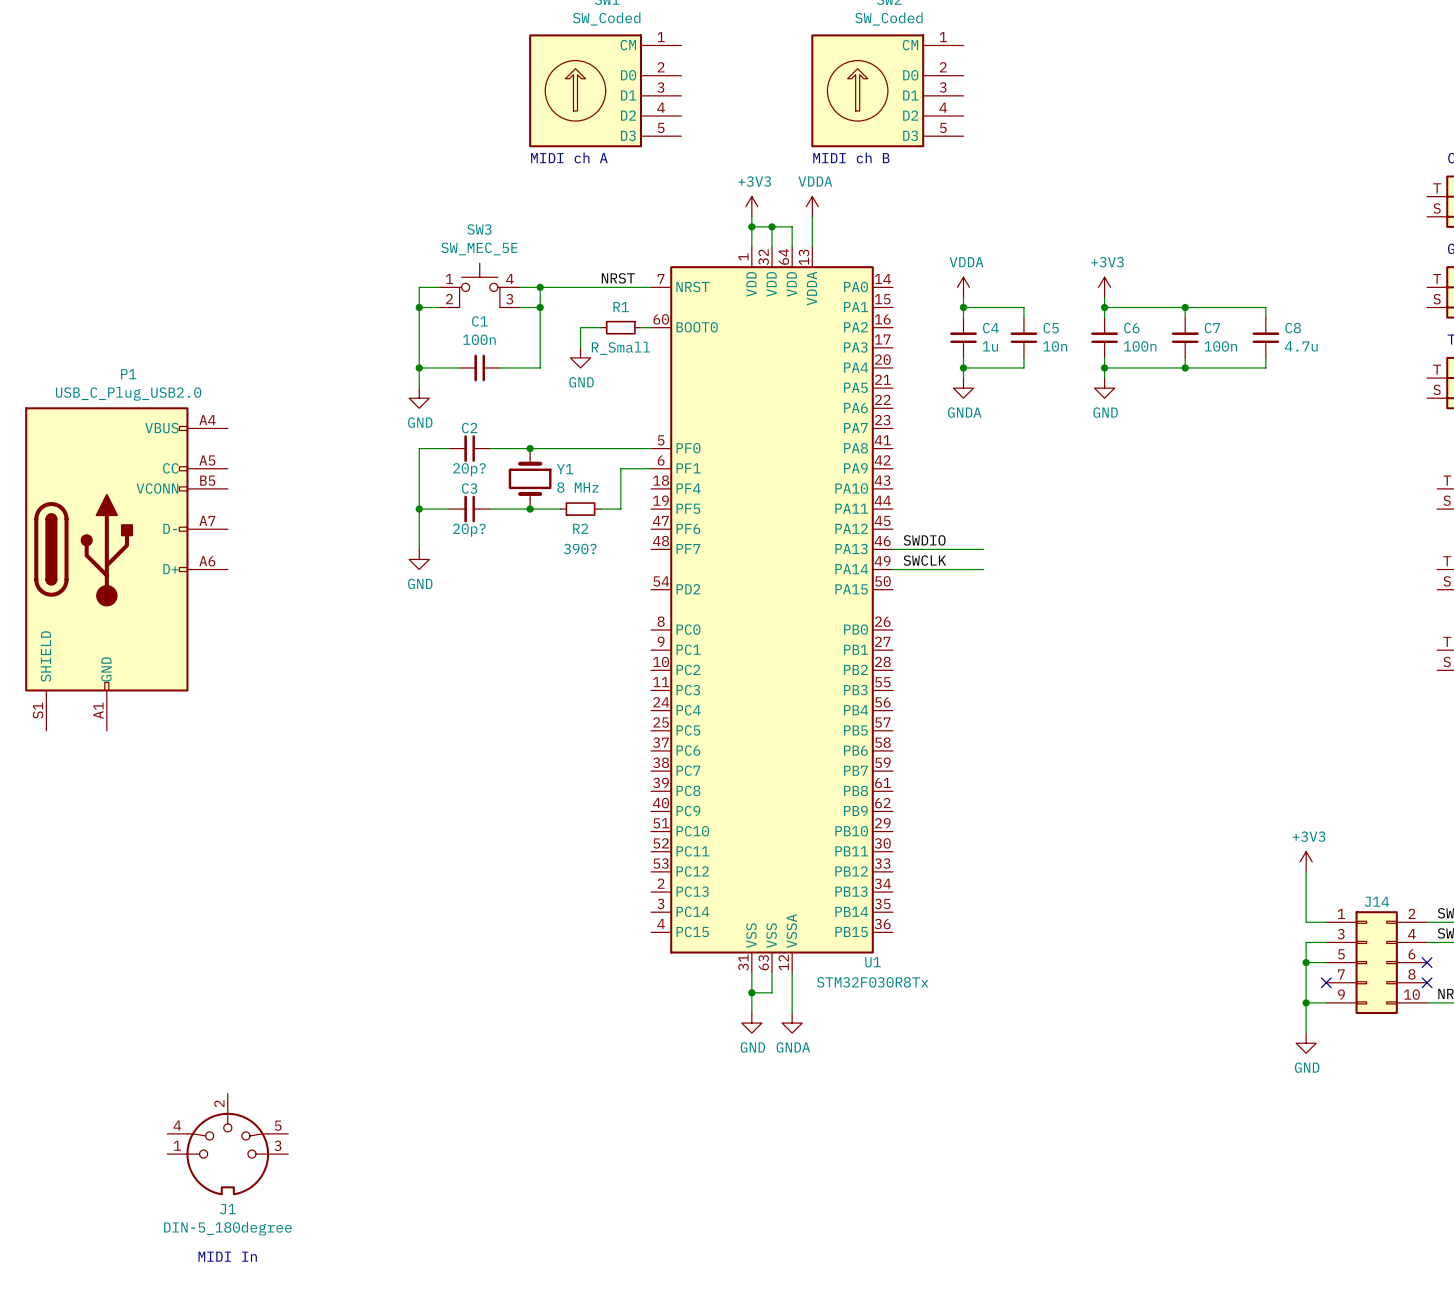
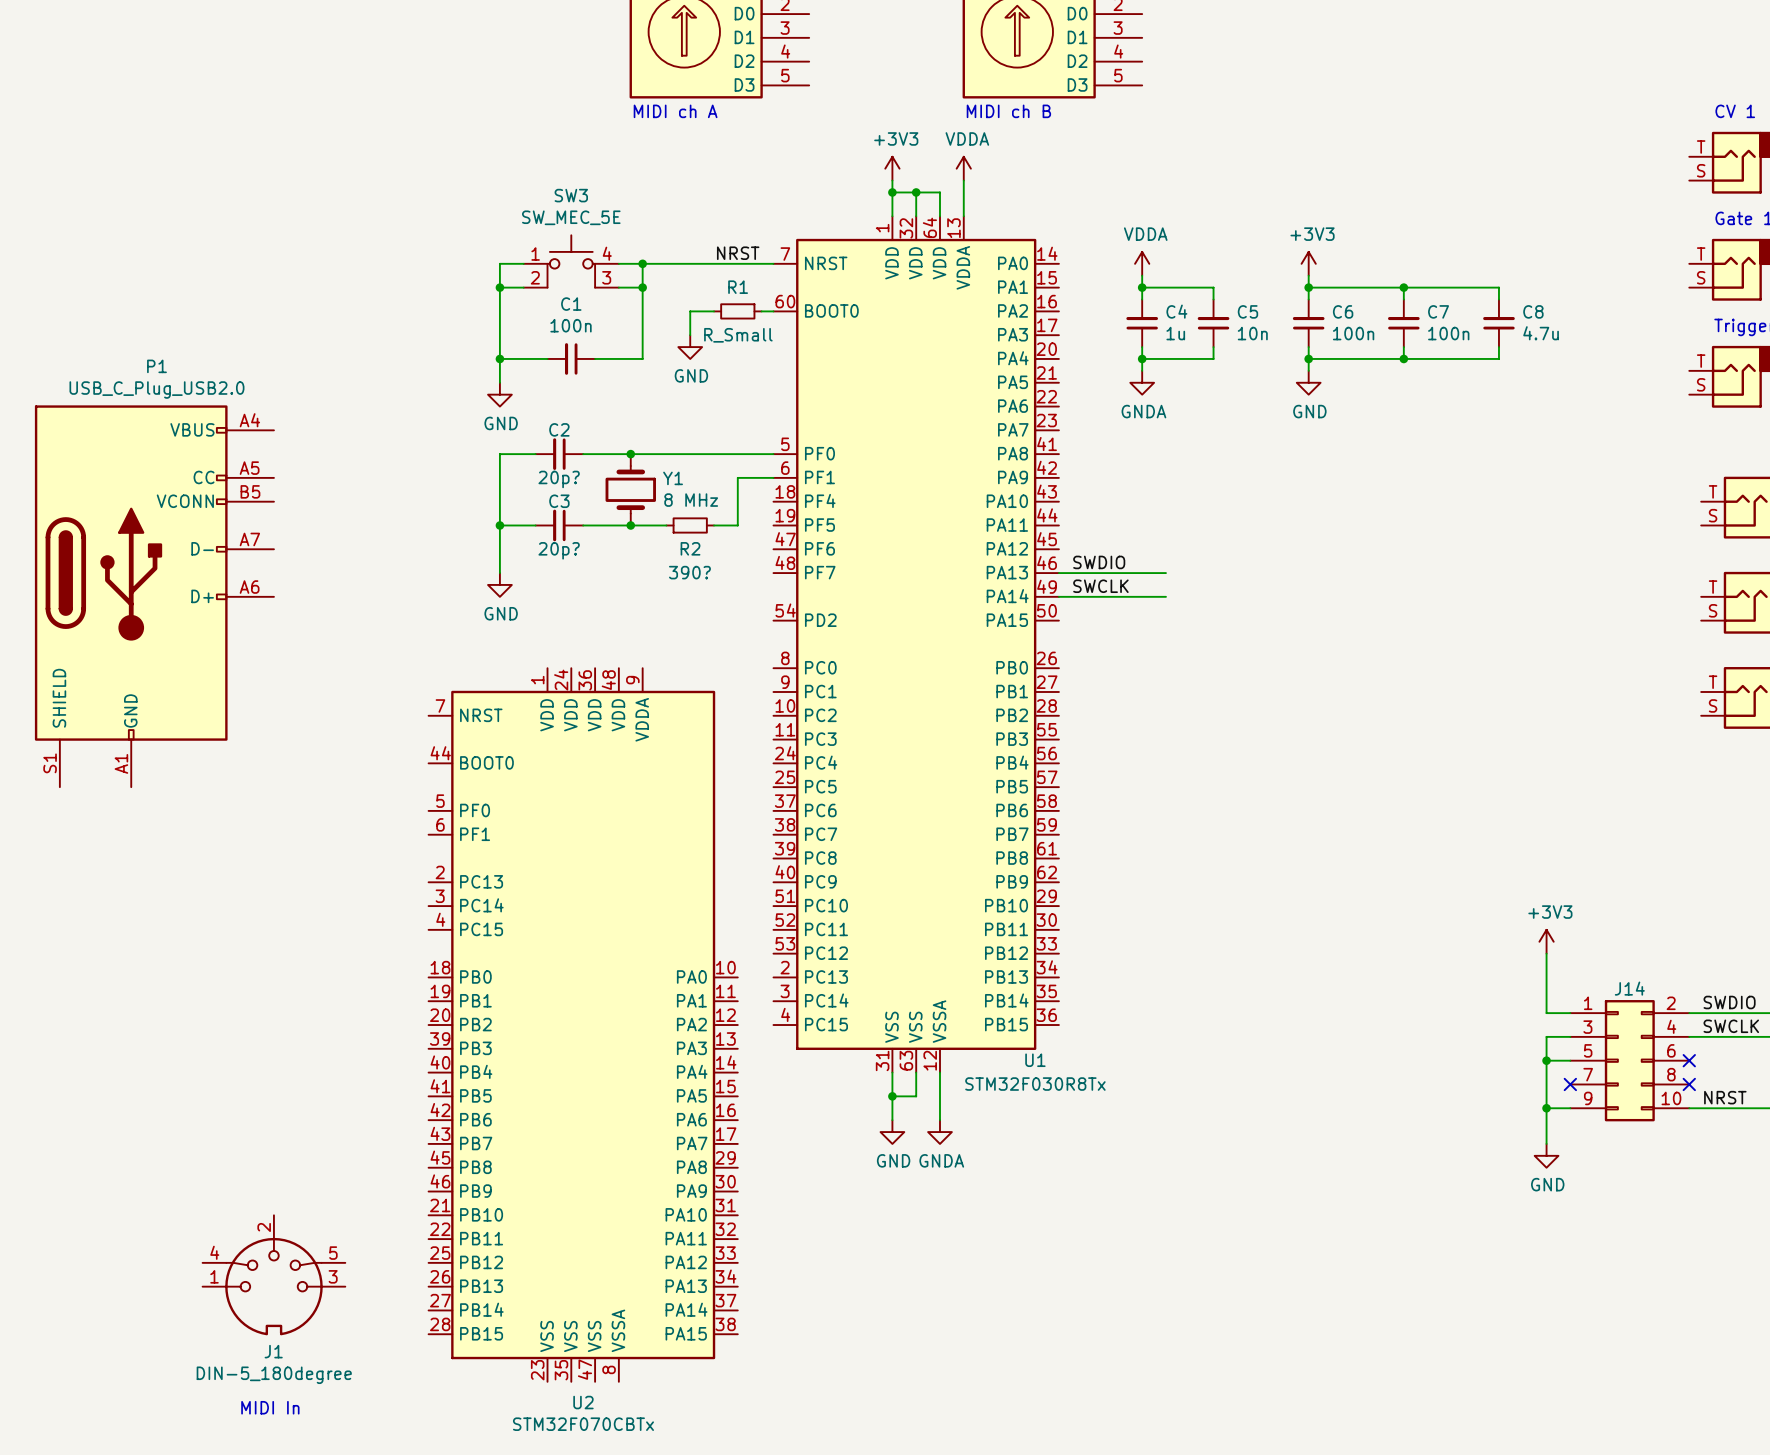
U2: none -> STM32F070CBTx (583, 1025)

